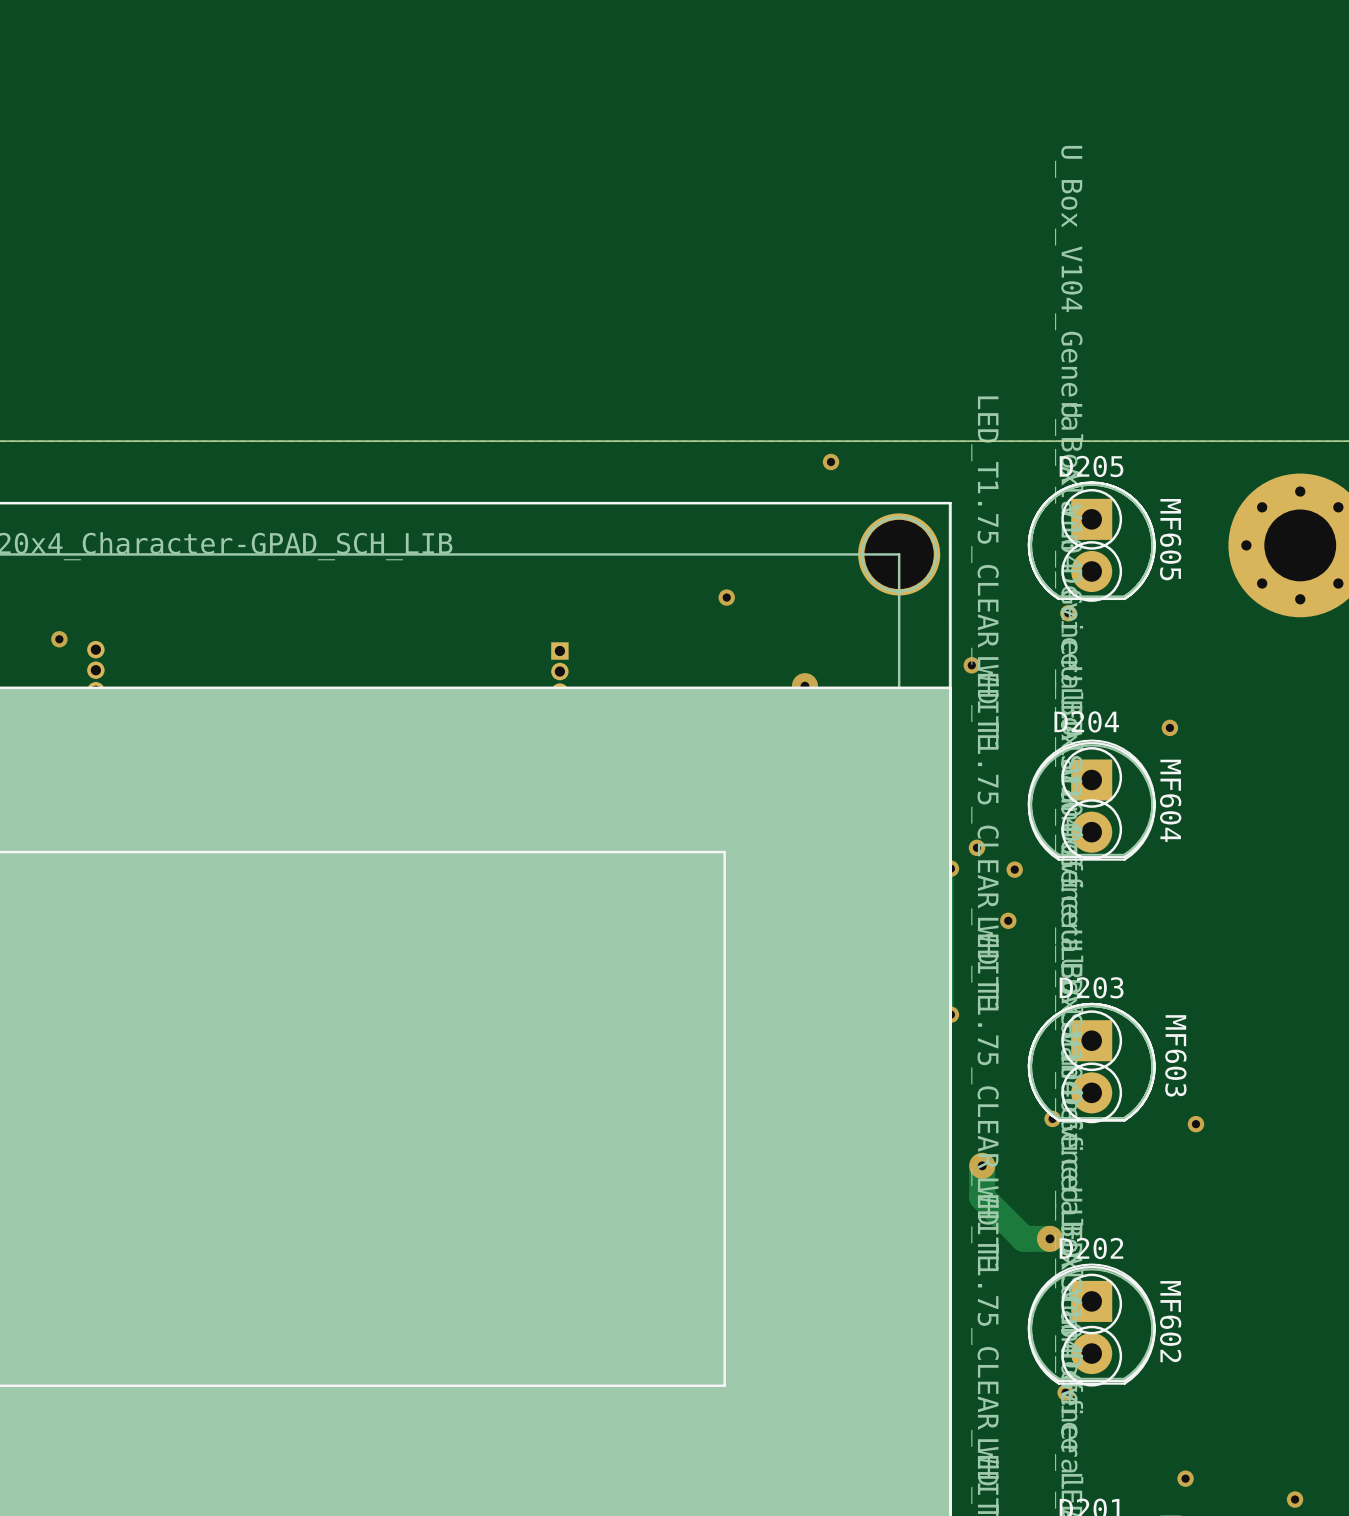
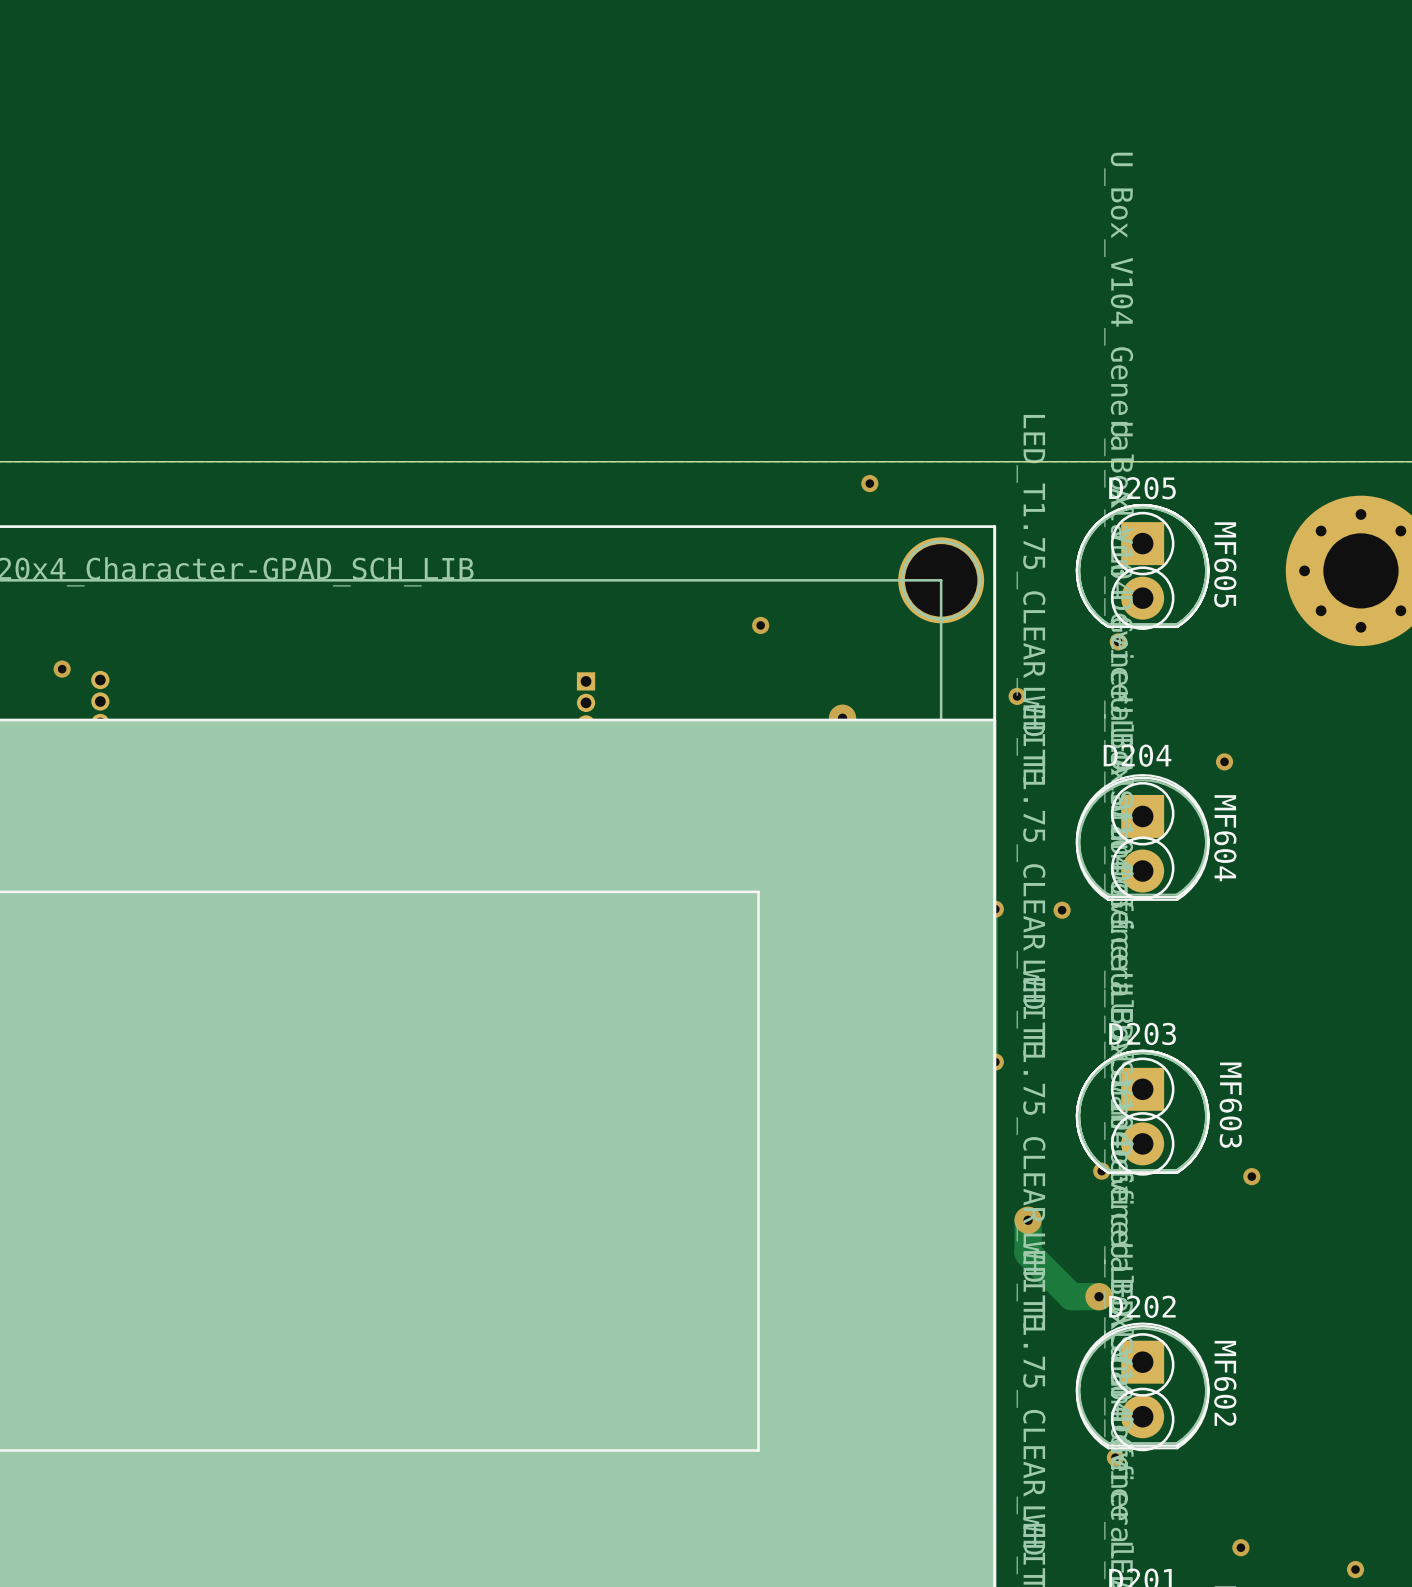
via: (977, 847) -> none
via: (1008, 920) -> none

